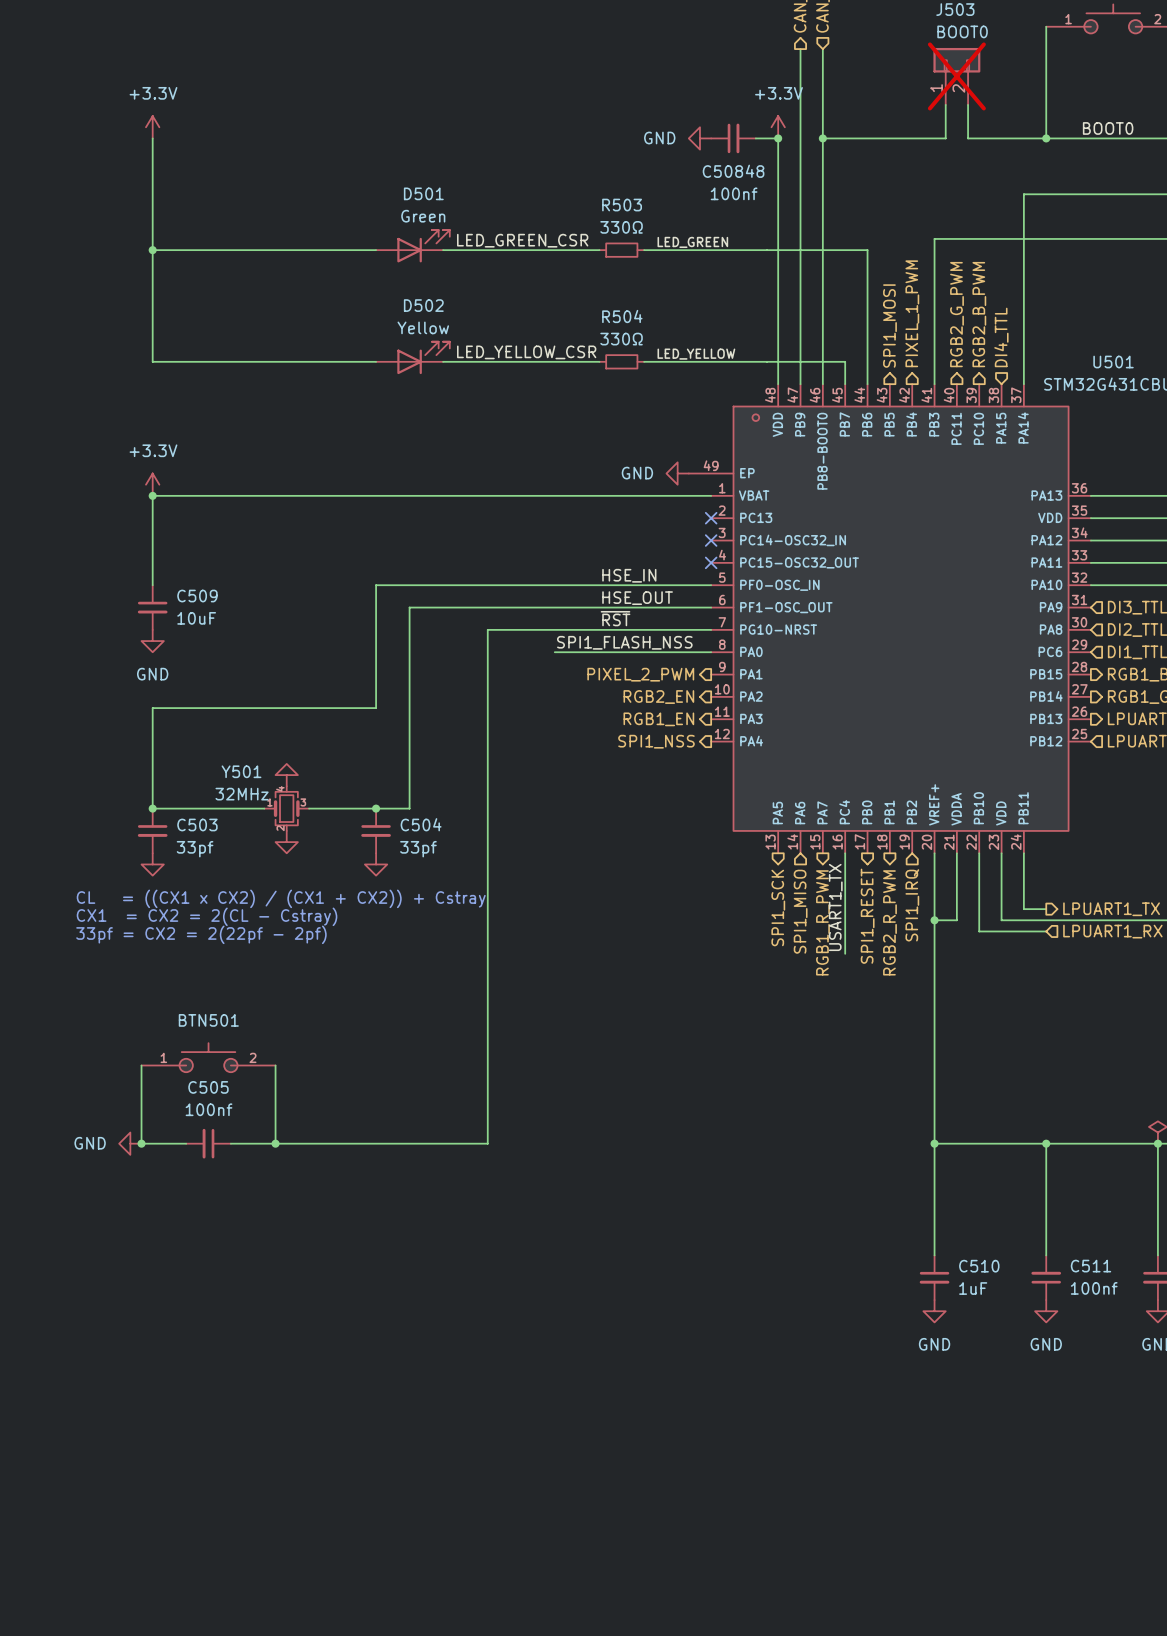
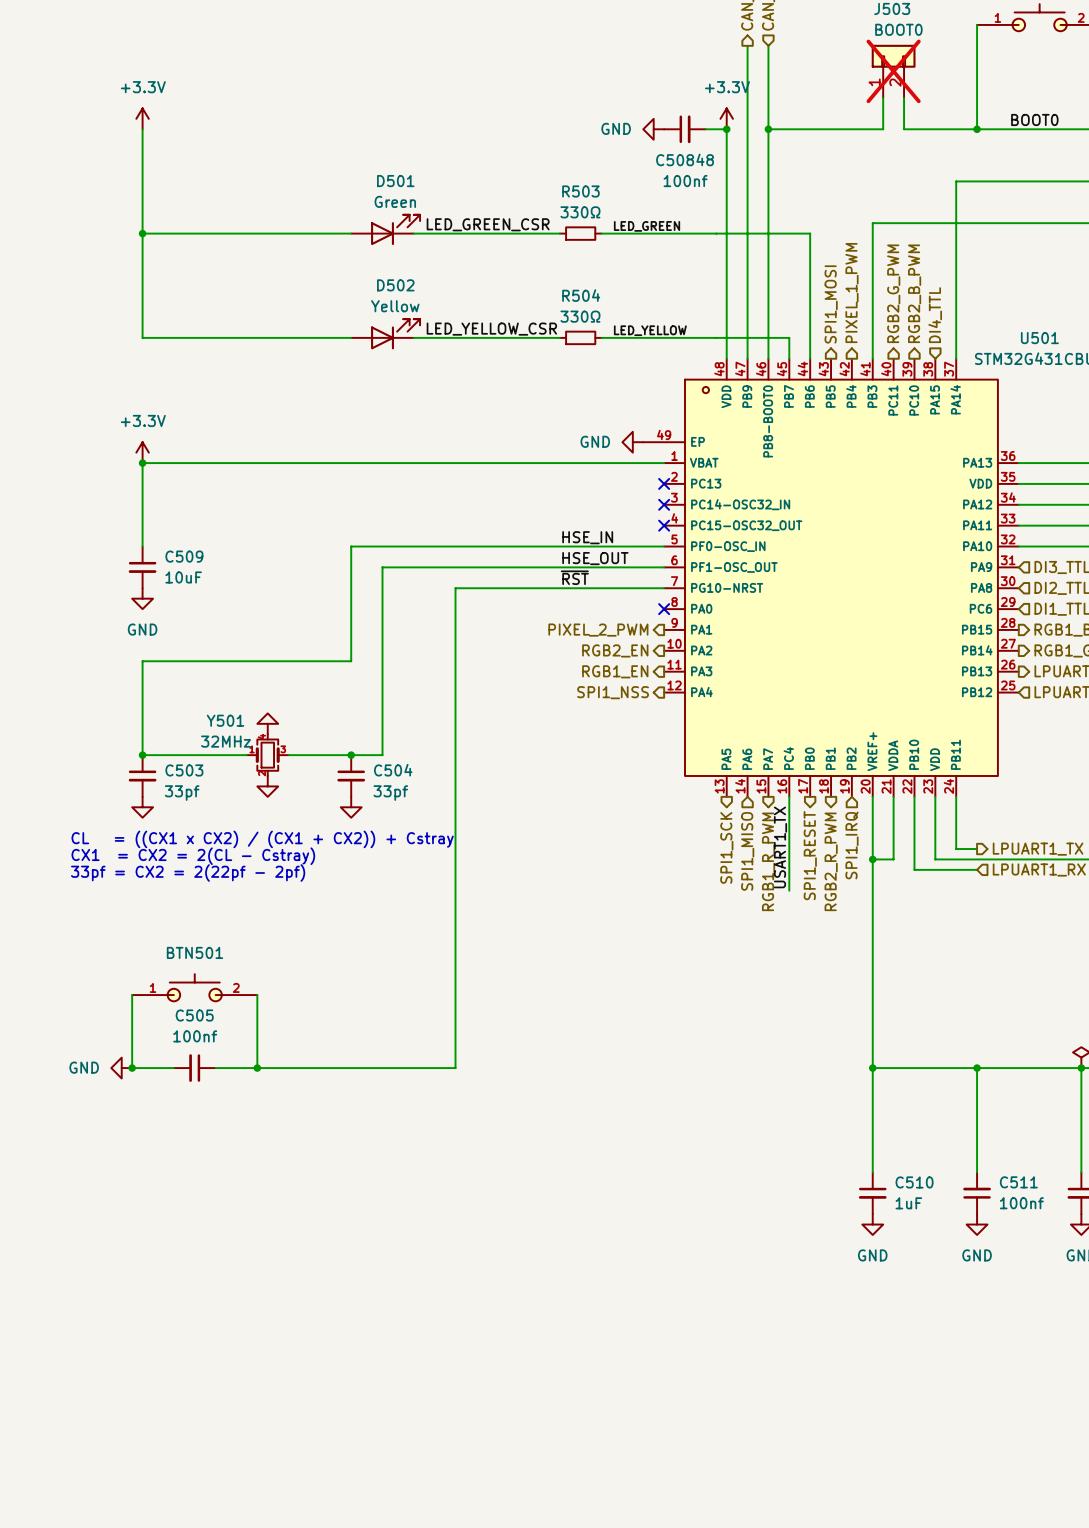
label: SPI1_FLASH_NSS (624, 642) -> none
wire: (554, 652) (711, 652) -> none
no-connect mark: none -> (664, 609)

